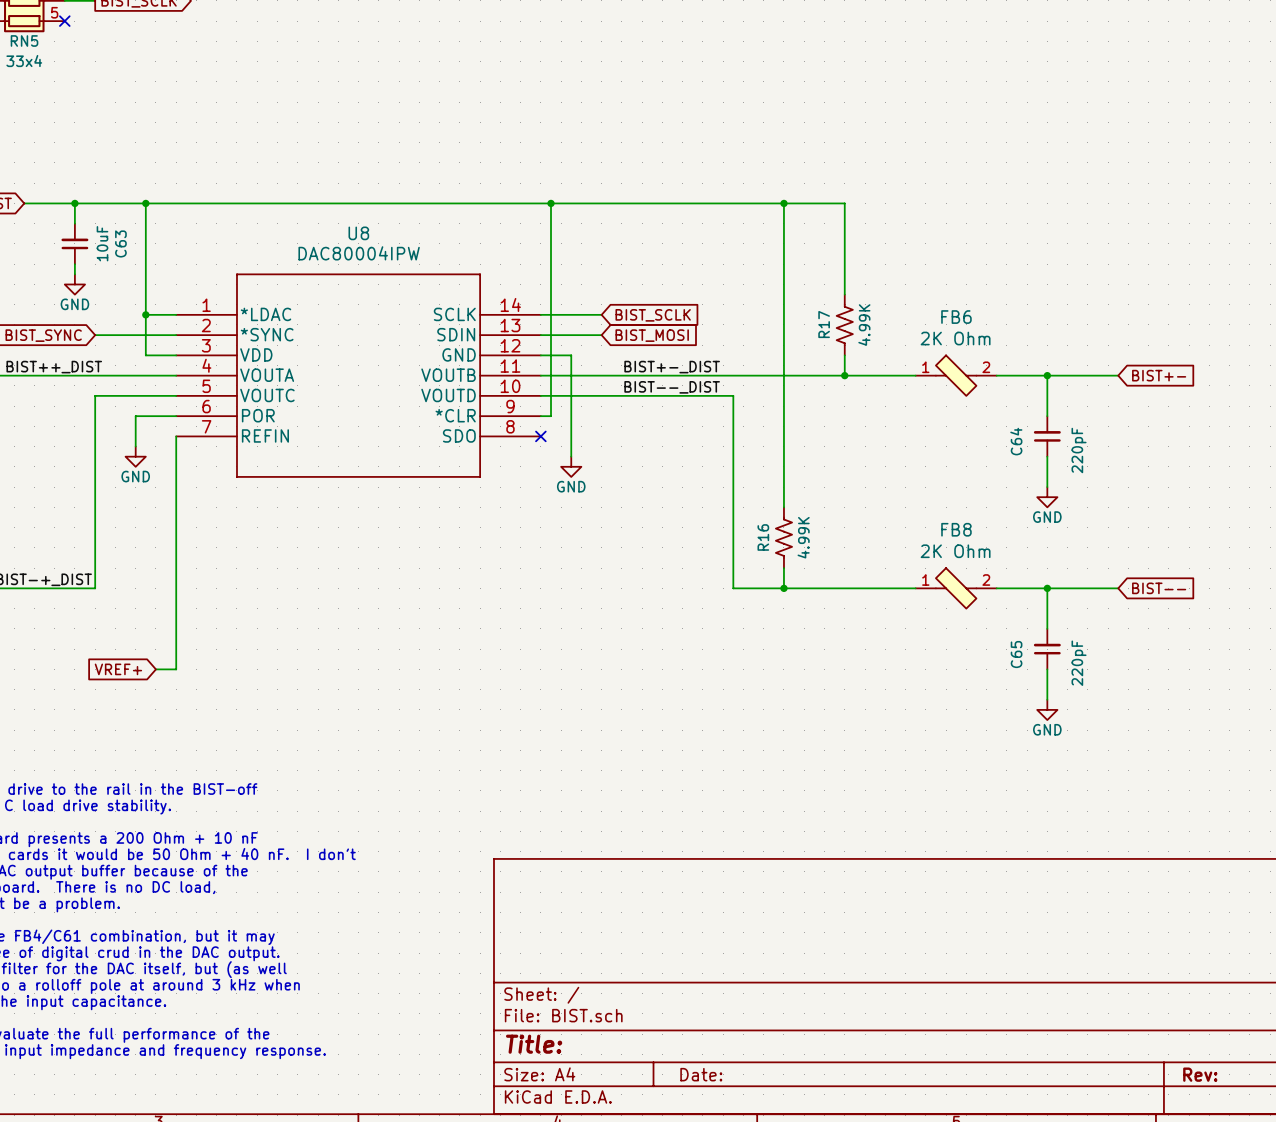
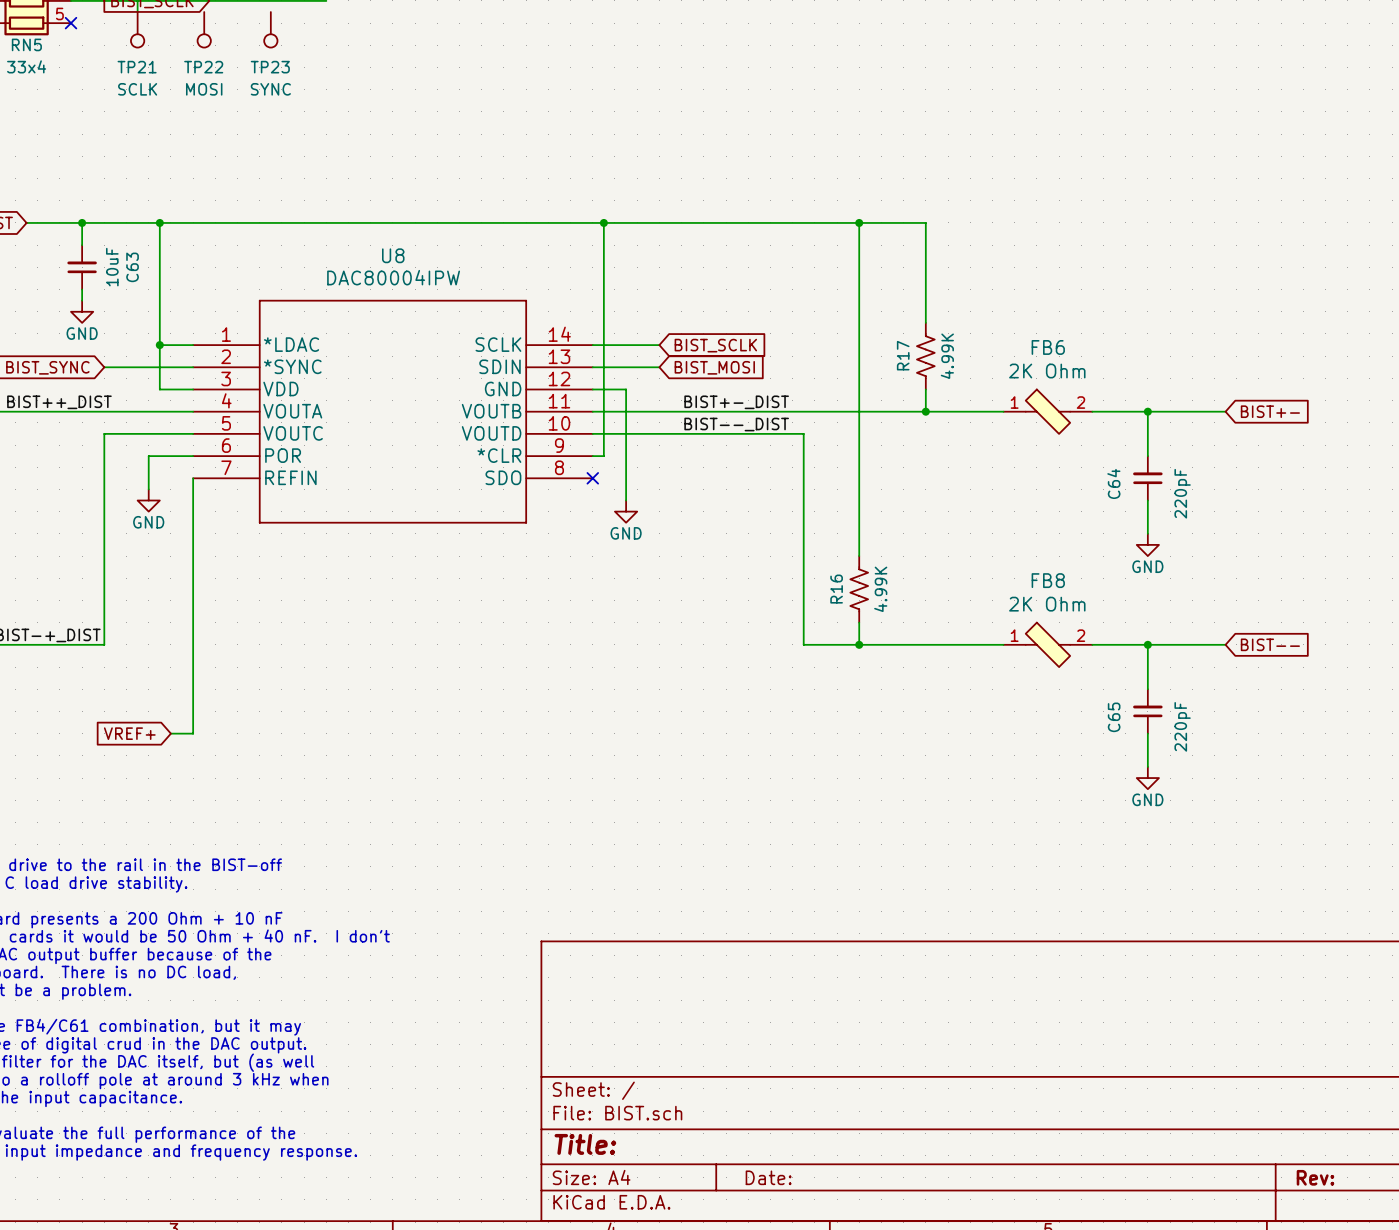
wire: none -> (104, 0) (326, 0)
wire: none -> (137, 0) (137, 12)
TP21: none -> SCLK (137, 29)
TP22: none -> MOSI (204, 29)
TP23: none -> SYNC (270, 29)

